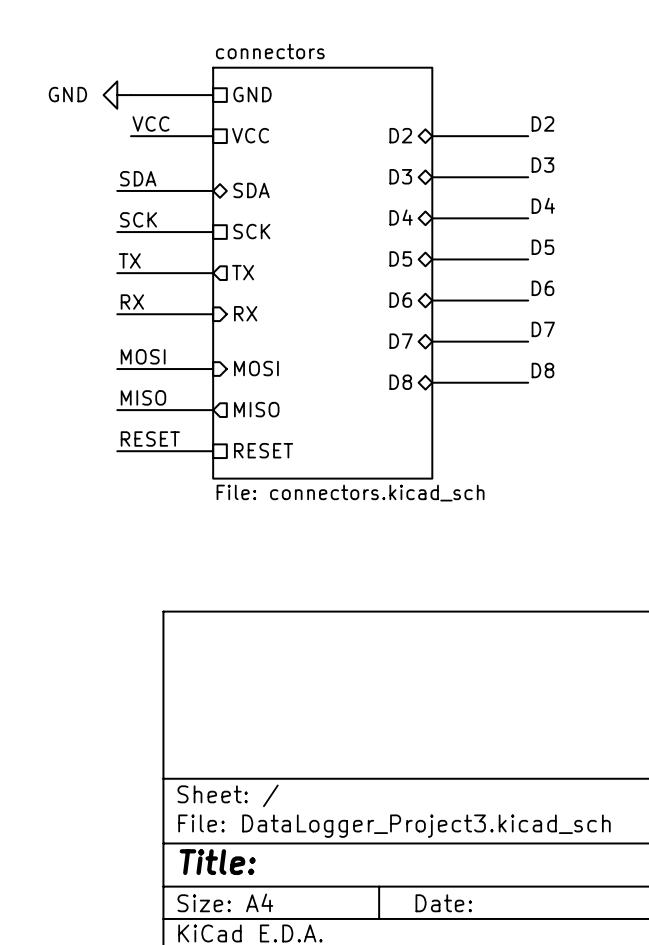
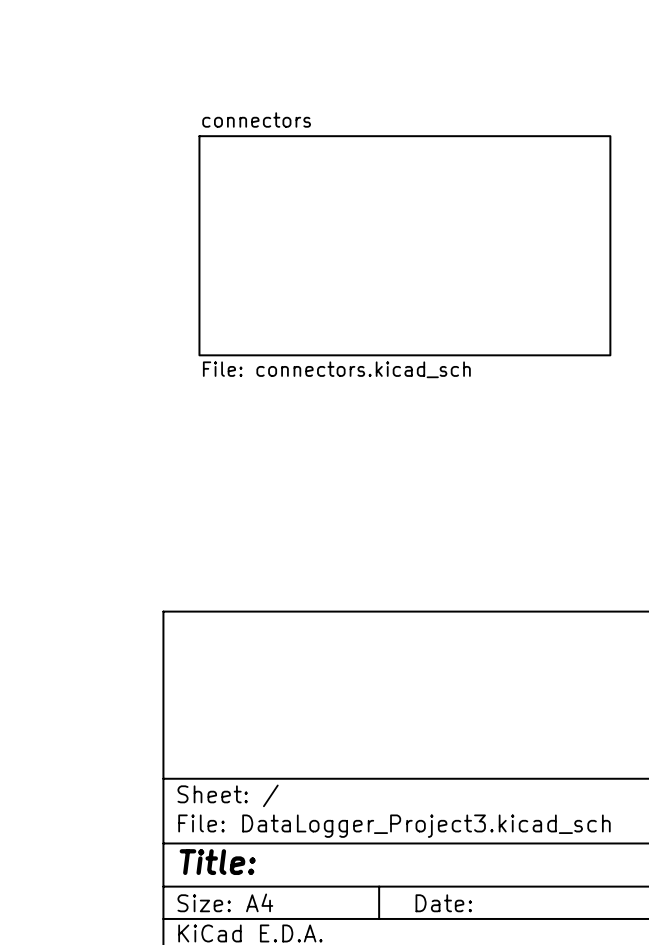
sheet connectors name position: connectors (270, 51) -> connectors (256, 119)
sheet pin: GND (252, 94) -> none
power symbol: GND (117, 95) -> none
wire: (130, 95) (213, 95) -> none
label: VCC (150, 123) -> none
label: D2 (542, 123) -> none
sheet pin: VCC (250, 135) -> none
sheet pin: D2 (400, 135) -> none
wire: (130, 136) (213, 136) -> none
label: D3 (542, 165) -> none
sheet pin: D3 (400, 176) -> none
wire: (432, 177) (528, 177) -> none
label: SDA (138, 178) -> none
wire: (117, 190) (213, 190) -> none
sheet pin: SDA (251, 190) -> none
label: D4 (543, 205) -> none
sheet pin: D4 (401, 217) -> none
wire: (432, 218) (528, 218) -> none
label: SCK (138, 219) -> none
sheet pin: SCK (251, 231) -> none
wire: (117, 232) (213, 232) -> none
label: D5 (542, 247) -> none
sheet pin: D5 (400, 258) -> none
wire: (432, 259) (528, 259) -> none
label: TX (129, 260) -> none
sheet pin: TX (243, 272) -> none
wire: (117, 273) (213, 273) -> none
sheet connectors rotation: 0° (322, 273) -> 90° clockwise (404, 245)
label: D6 (542, 288) -> none
sheet pin: D6 (400, 300) -> none
wire: (432, 300) (528, 300) -> none
label: RX (132, 302) -> none
sheet pin: RX (245, 313) -> none
wire: (117, 314) (213, 314) -> none
label: D7 (543, 329) -> none
sheet pin: D7 (401, 341) -> none
wire: (432, 341) (528, 341) -> none
label: MOSI (143, 356) -> none
sheet pin: MOSI (256, 368) -> none
wire: (117, 369) (213, 369) -> none
label: D8 (542, 370) -> none
sheet pin: D8 (400, 382) -> none
wire: (432, 382) (528, 382) -> none
label: MISO (143, 397) -> none
sheet pin: MISO (256, 409) -> none
wire: (117, 410) (213, 410) -> none
label: RESET (150, 438) -> none
sheet pin: RESET (263, 450) -> none
wire: (117, 451) (213, 451) -> none
sheet connectors value position: File: connectors.kicad_sch (350, 493) -> File: connectors.kicad_sch (336, 369)

